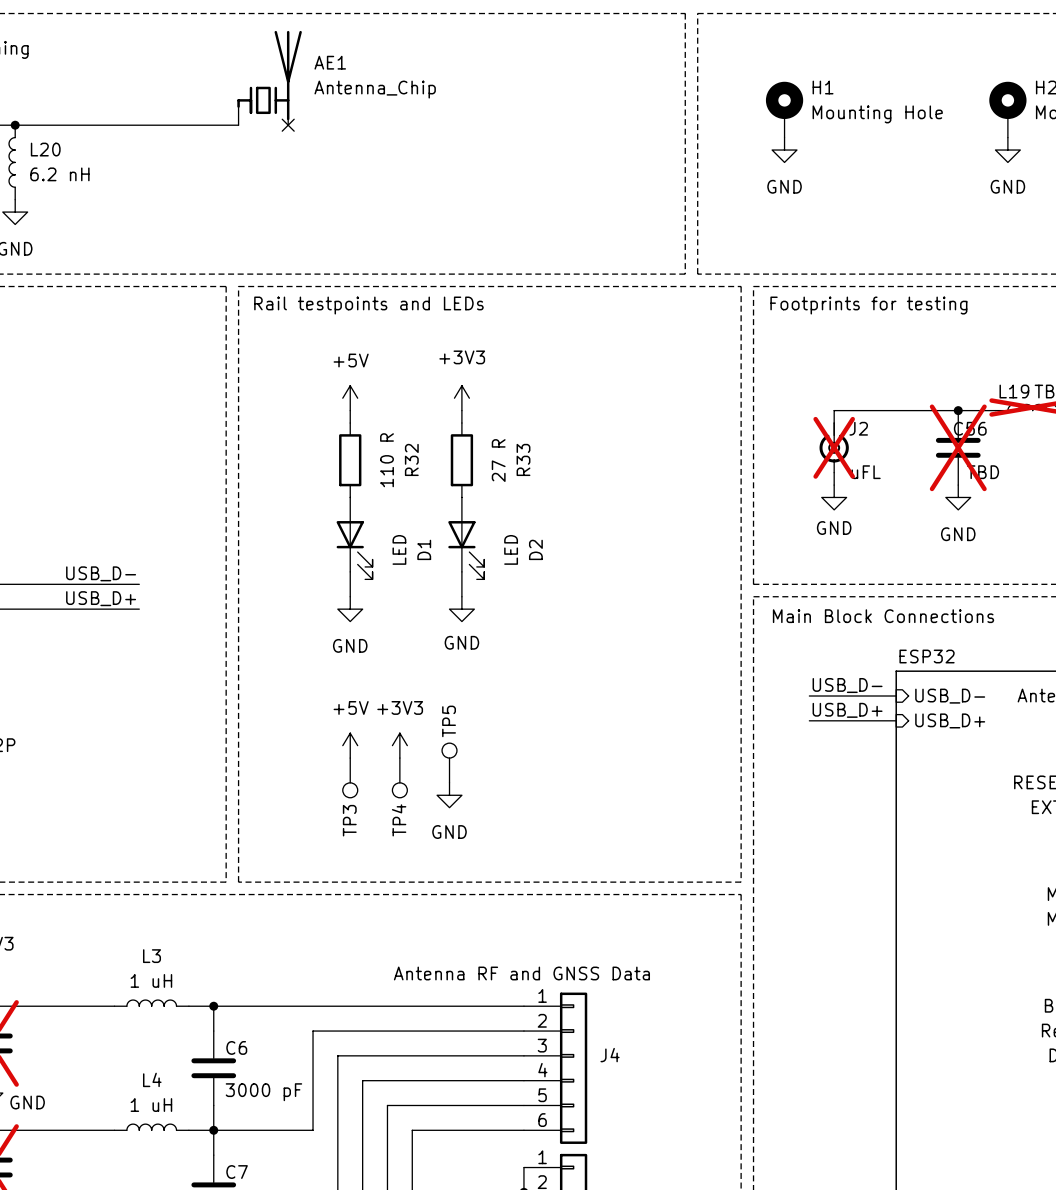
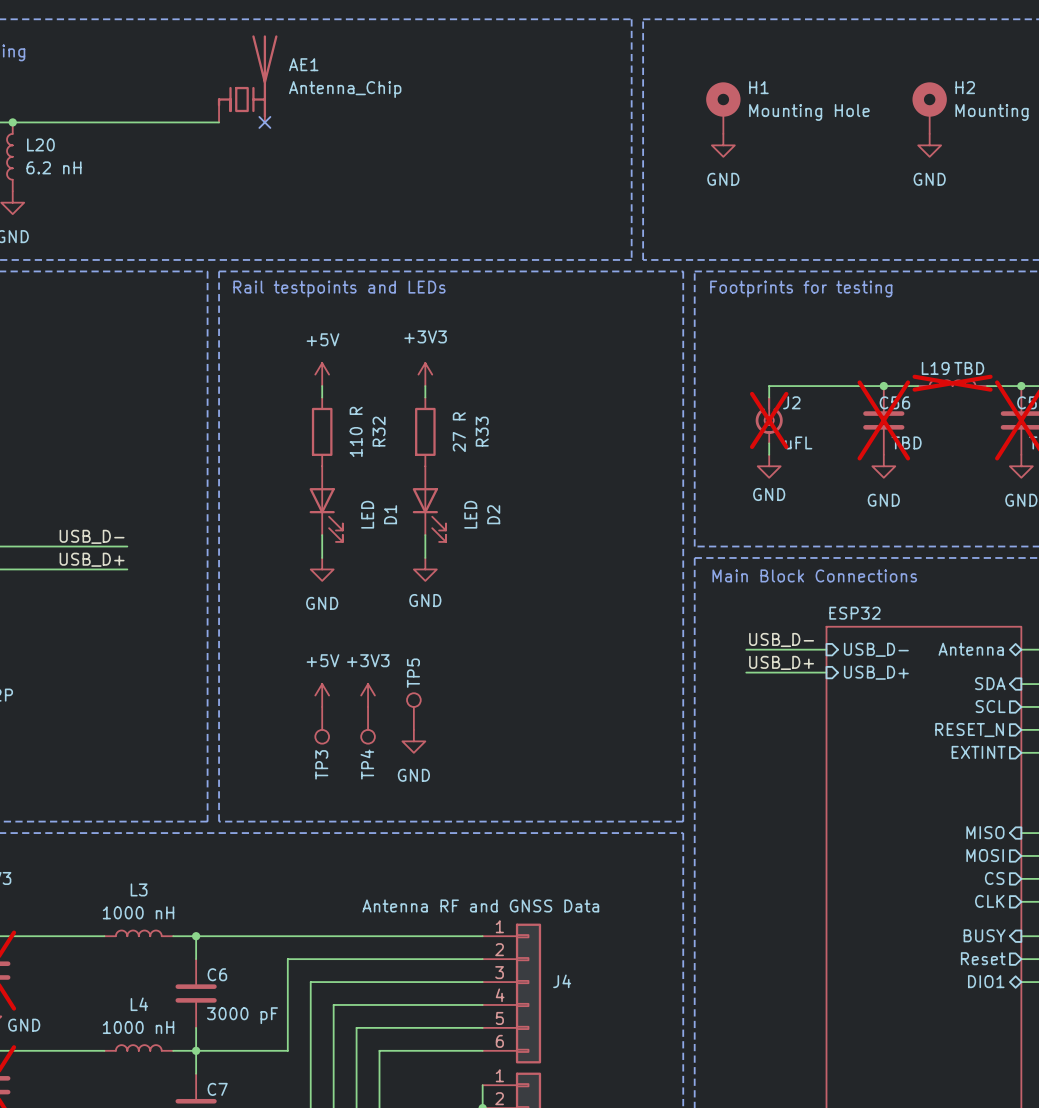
L3 value: 1 uH (151, 980) -> 1000 nH (138, 912)
L4 value: 1 uH (151, 1105) -> 1000 nH (138, 1027)

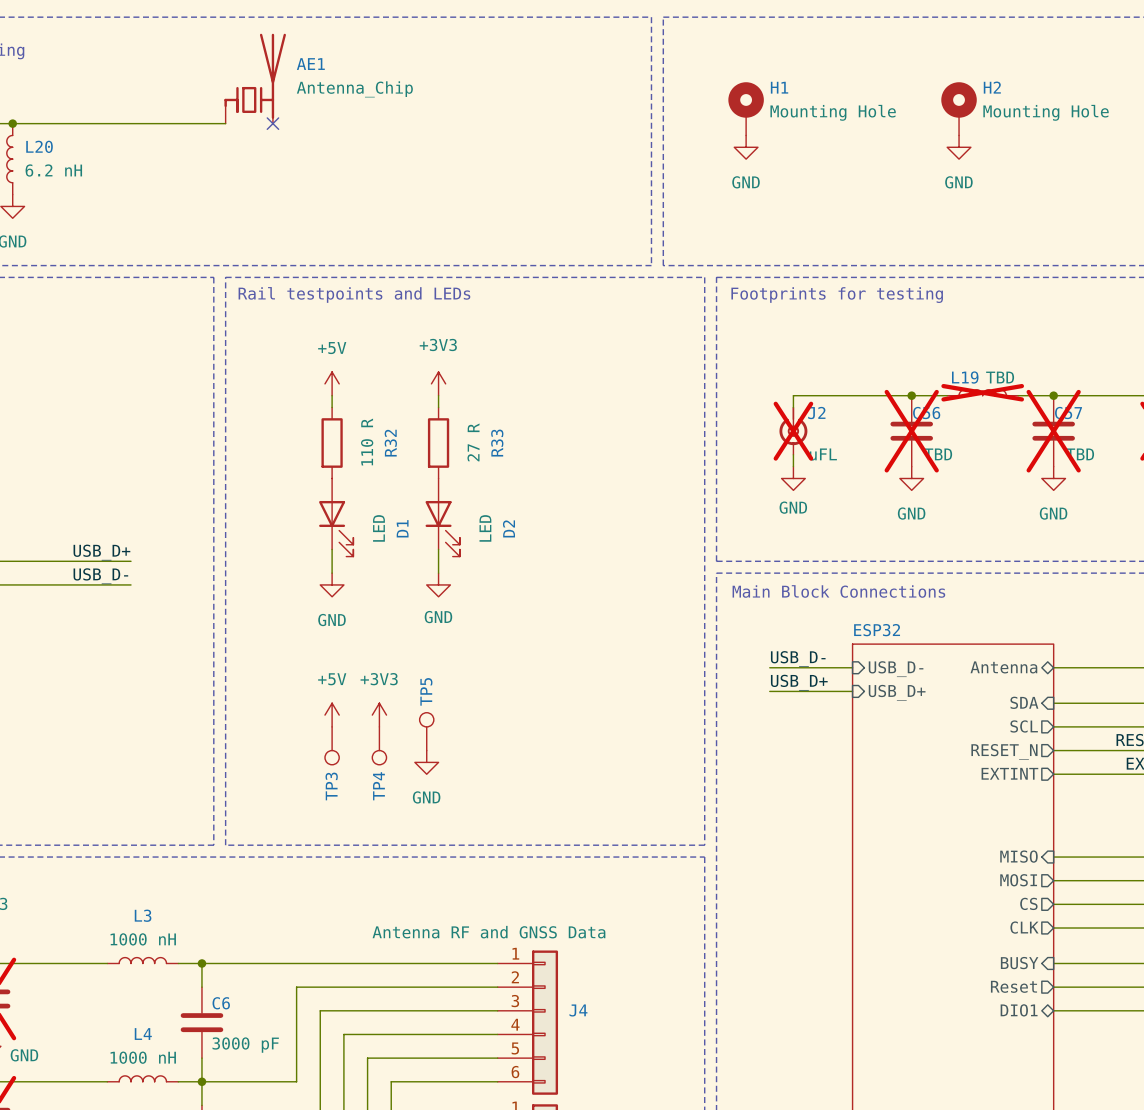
label: USB_D- (92, 536) -> USB_D+ (101, 552)
label: USB_D+ (92, 559) -> USB_D- (100, 576)

